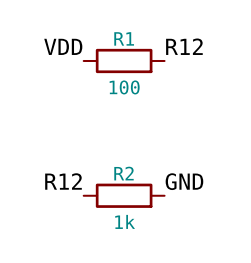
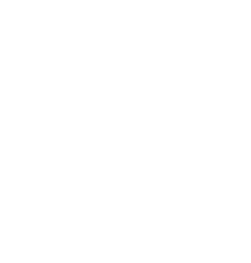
label: VDD (63, 46) -> none
label: R12 (184, 46) -> none
R1: 100 (124, 60) -> none
label: R12 (63, 181) -> none
label: GND (184, 181) -> none
R2: 1k (124, 195) -> none

